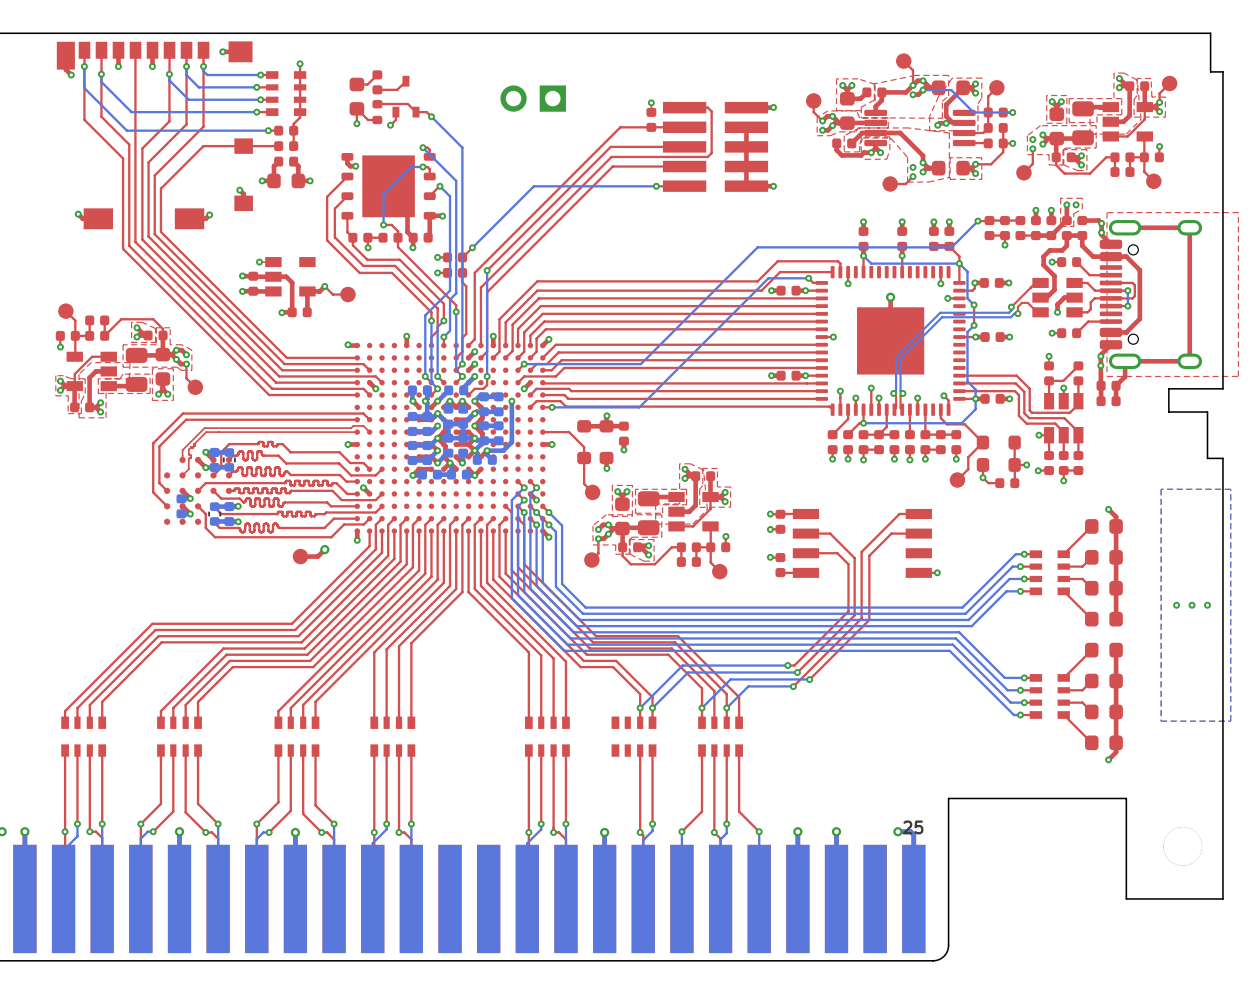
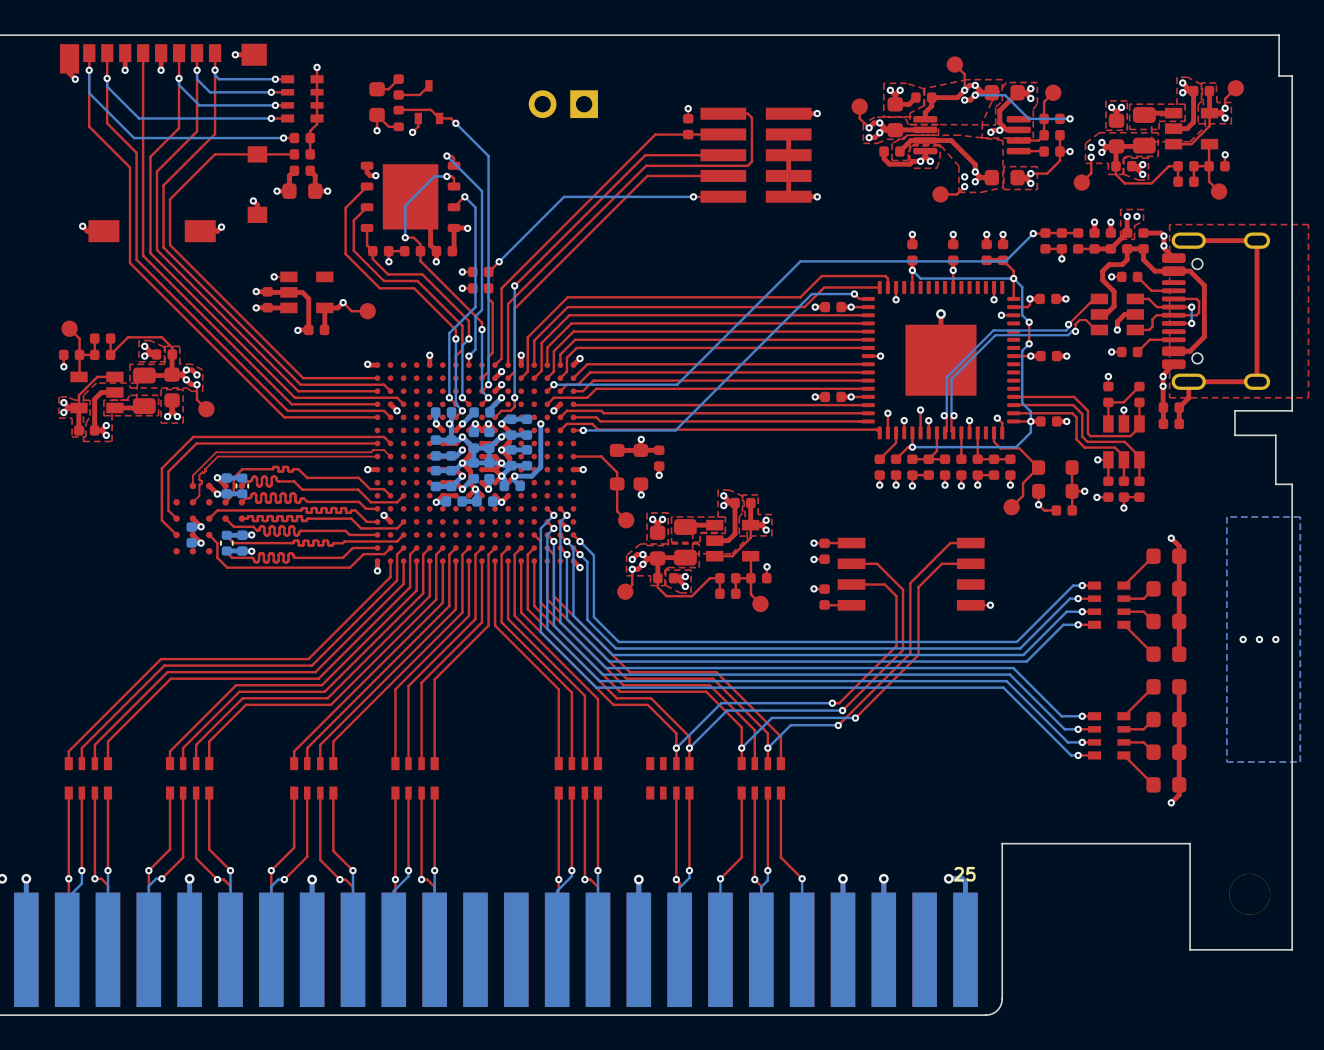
top track: (324, 549) (317, 556) (300, 556) -> none
via: (324, 549) -> none
part: (300, 556) -> none

